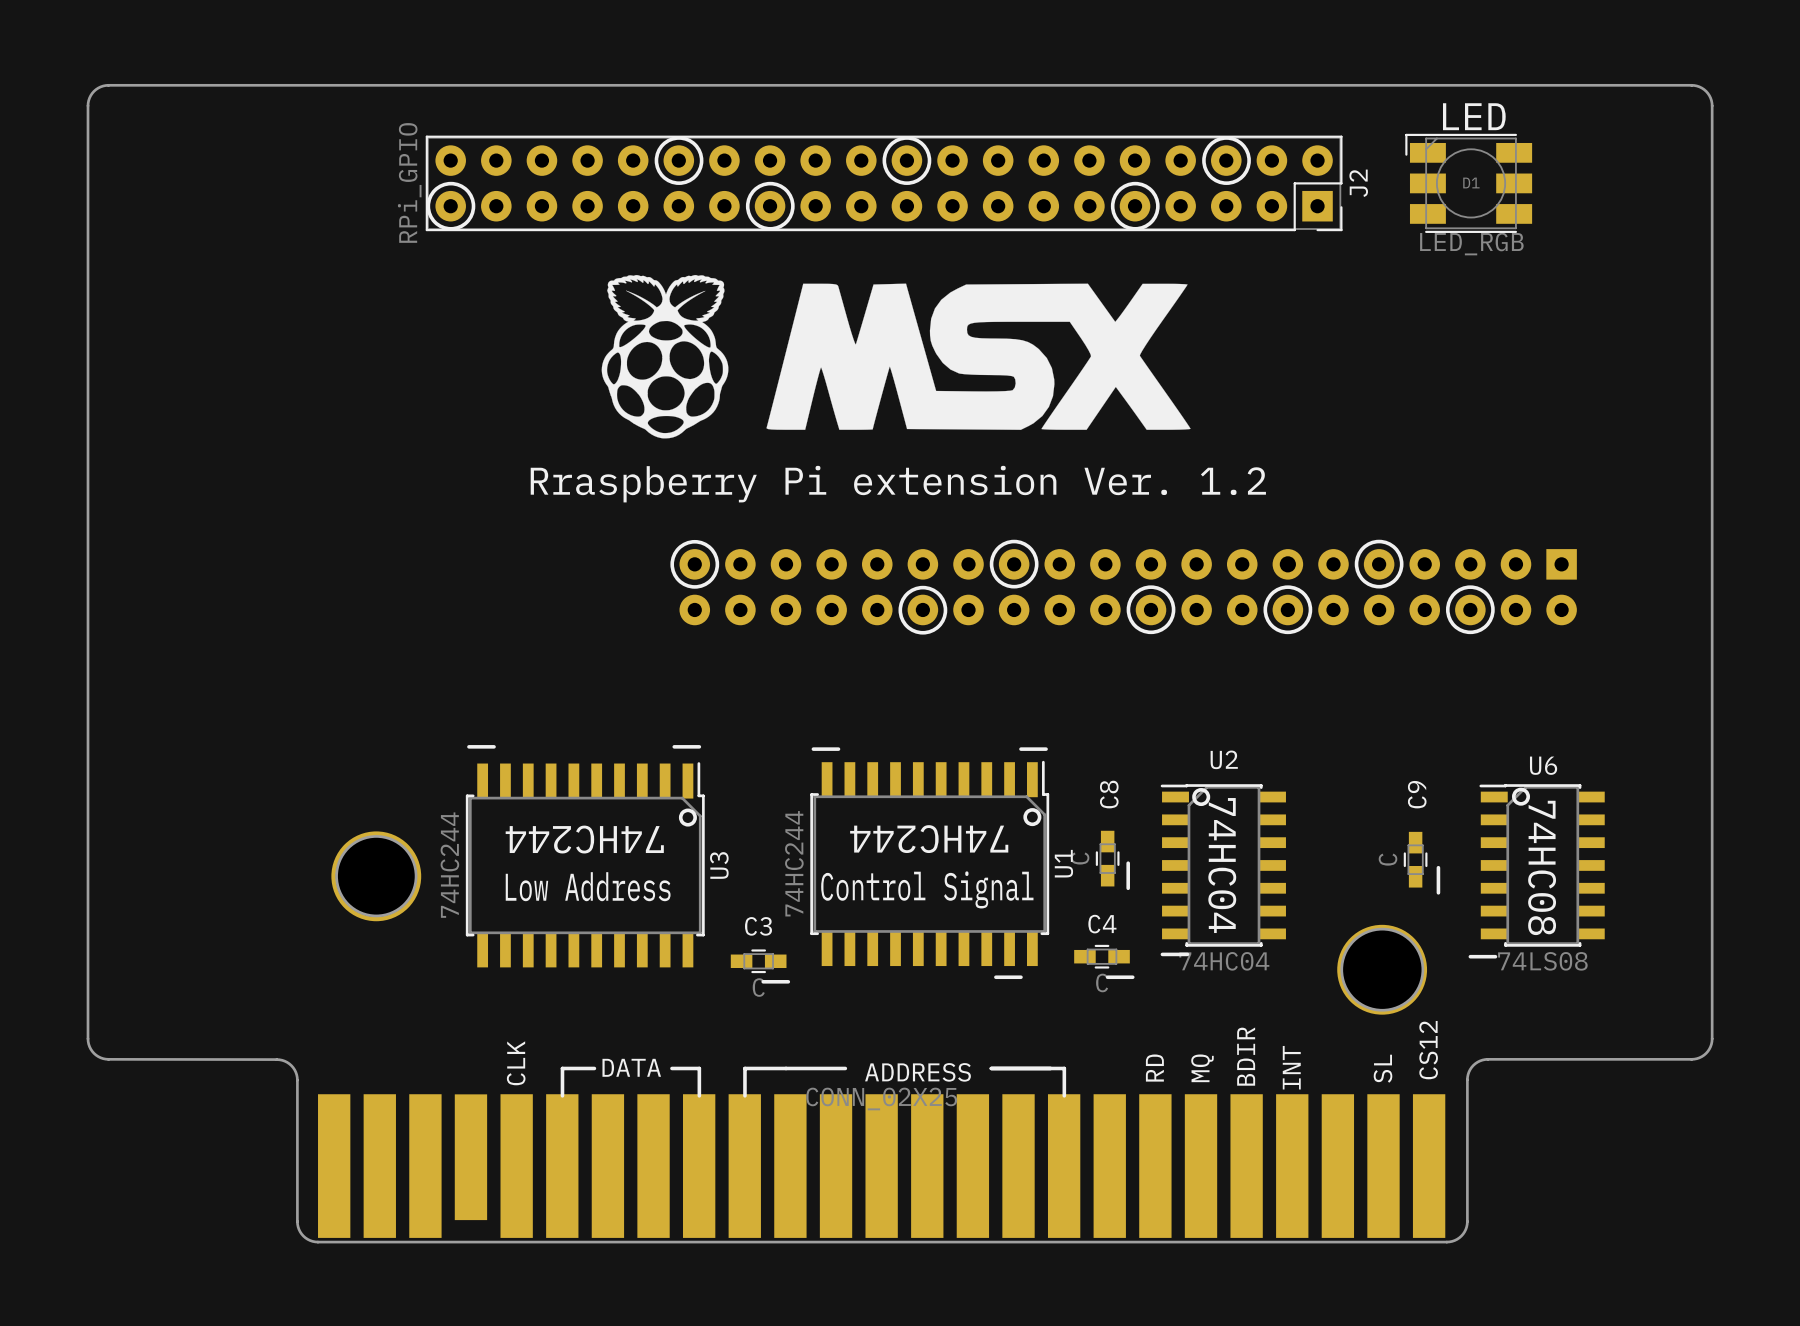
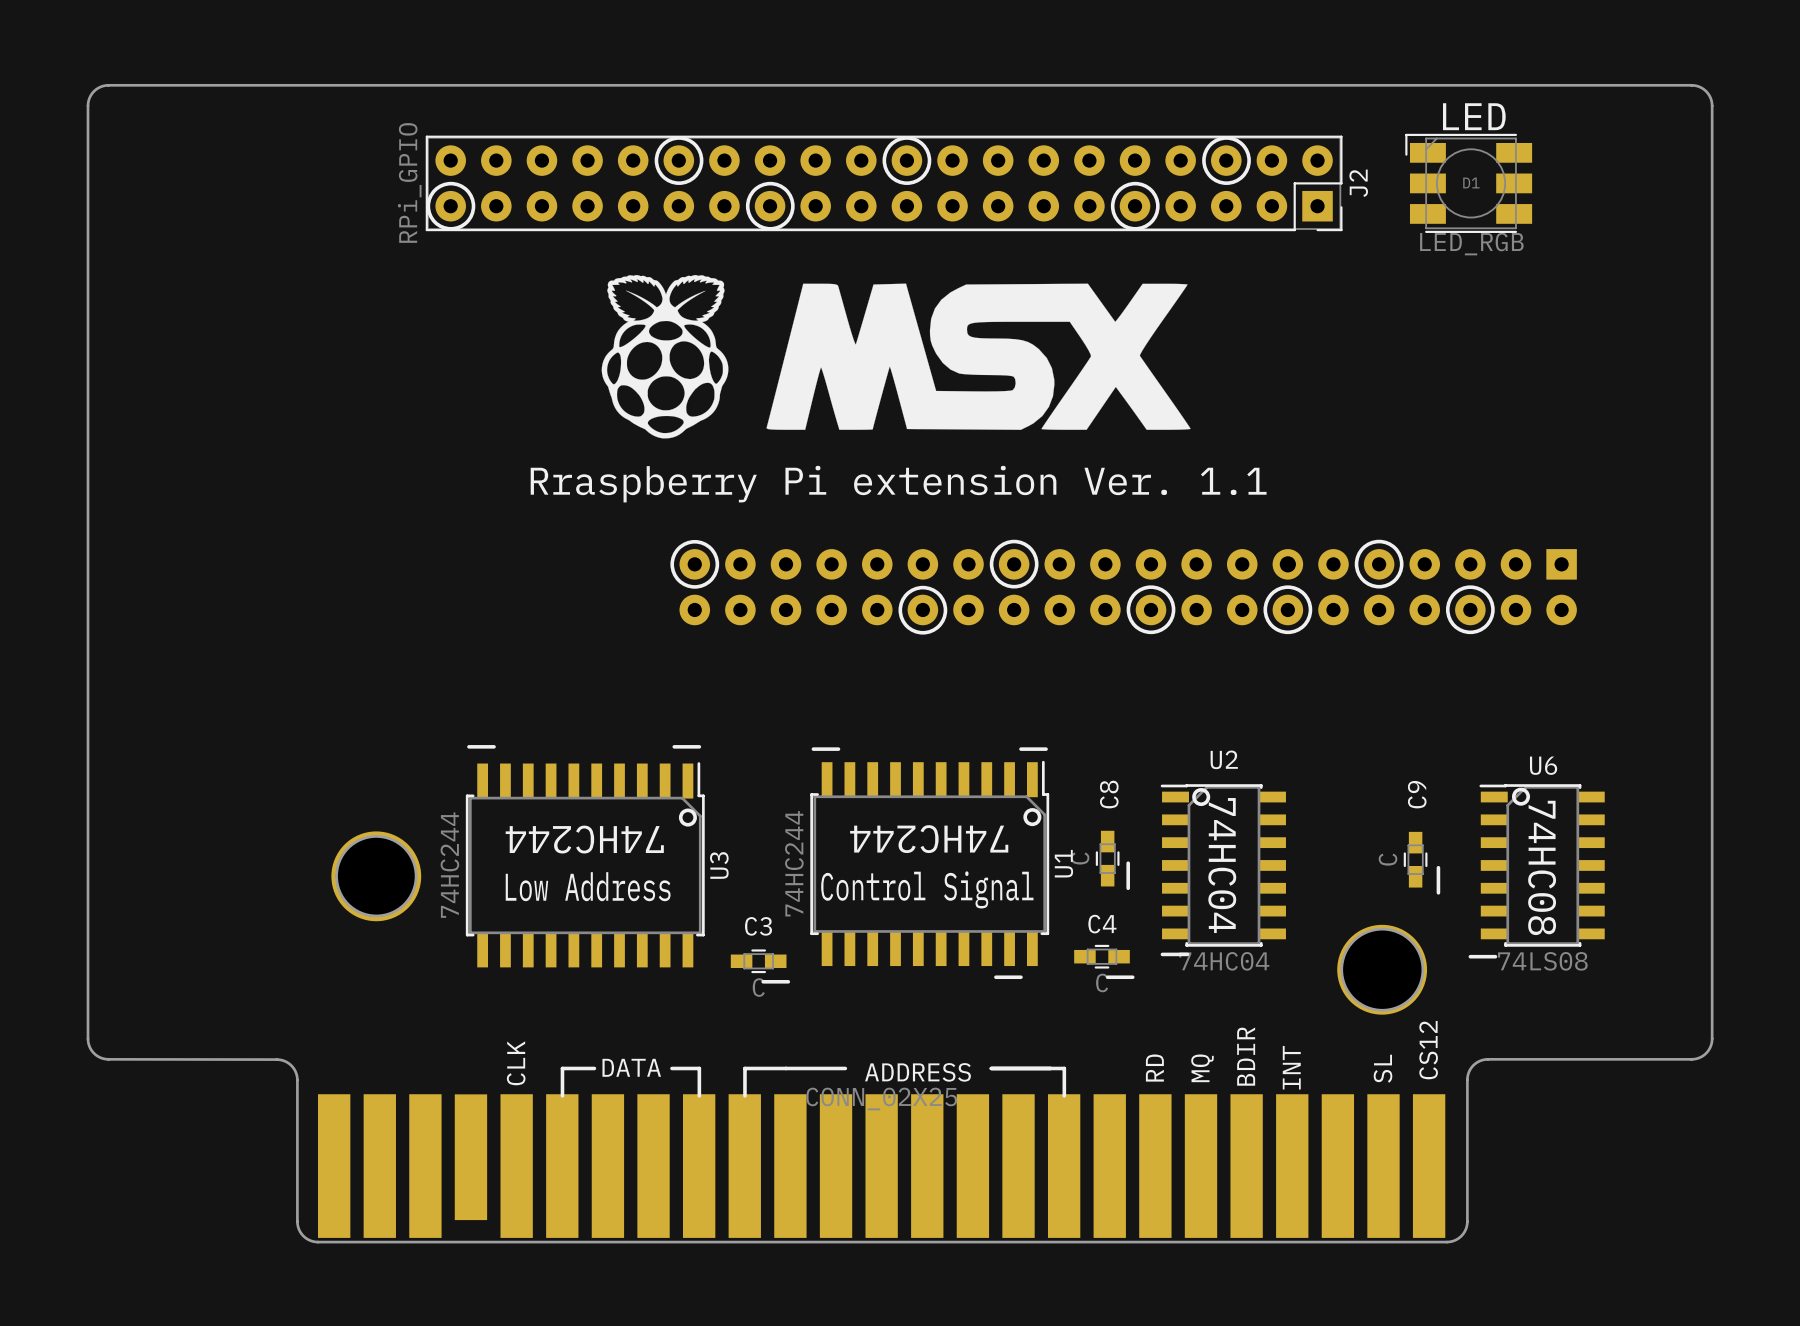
text: Rraspberry Pi extension Ver. 1.2 (898, 484) -> Rraspberry Pi extension Ver. 1.1 (898, 484)

